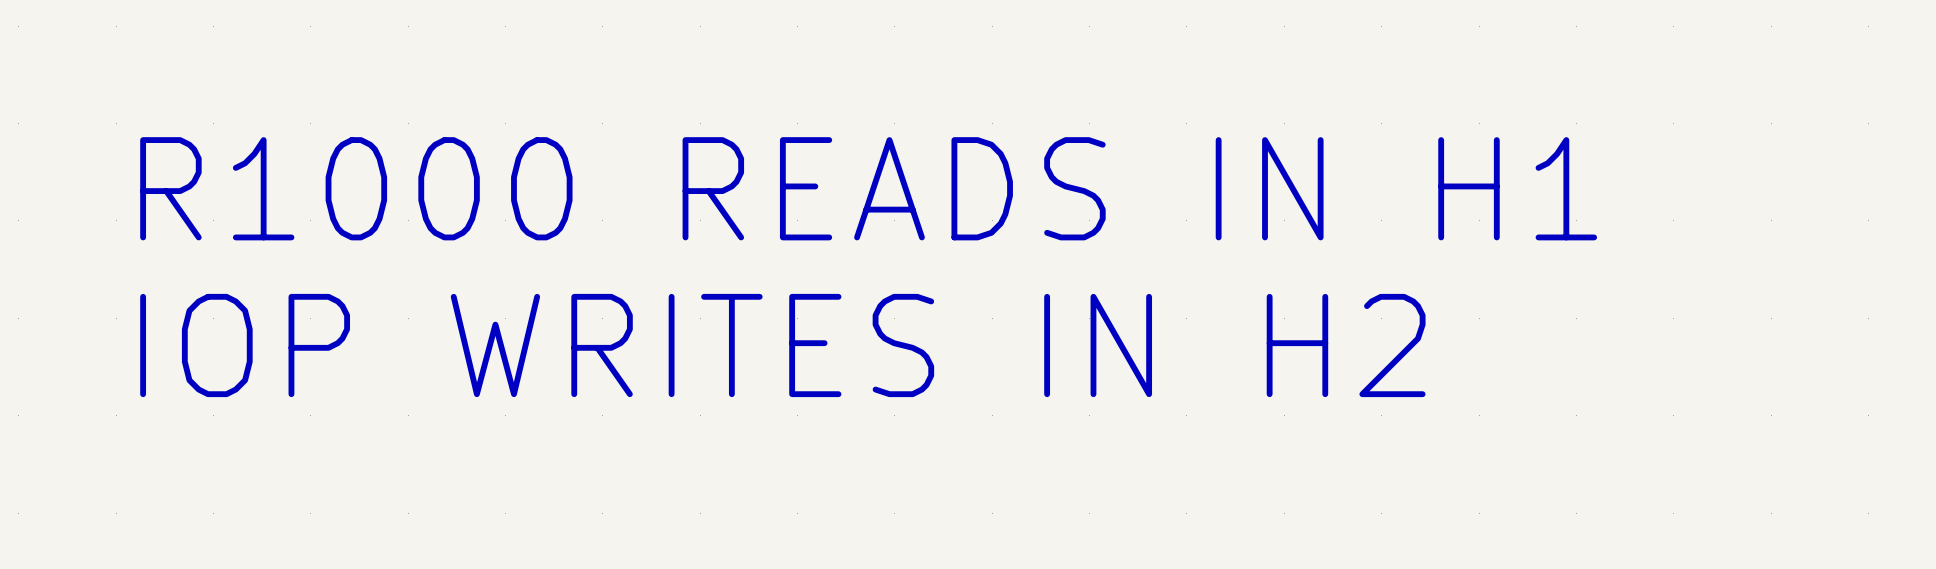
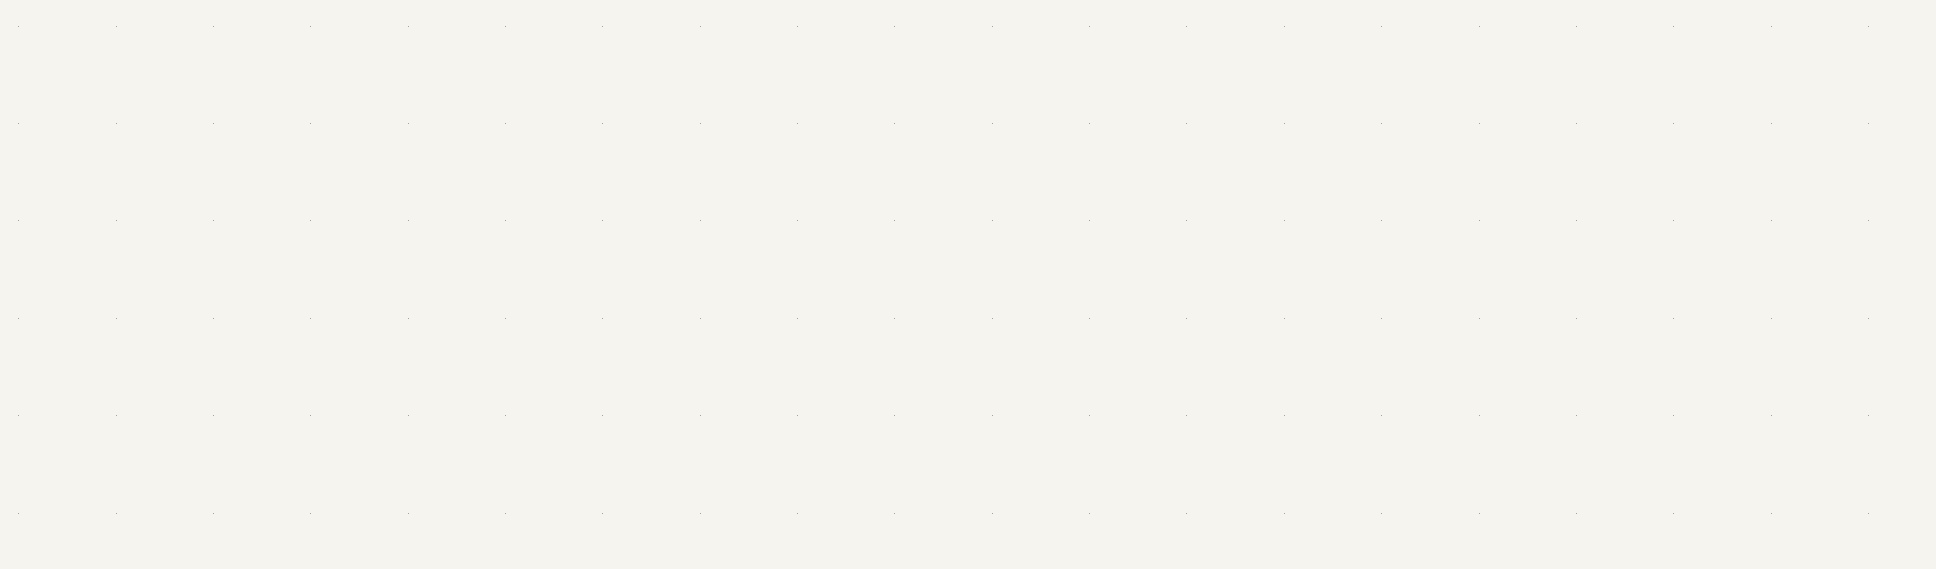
text: R1000 READS IN H1 (868, 188) -> none
text: IOP WRITES IN H2 (782, 345) -> none

